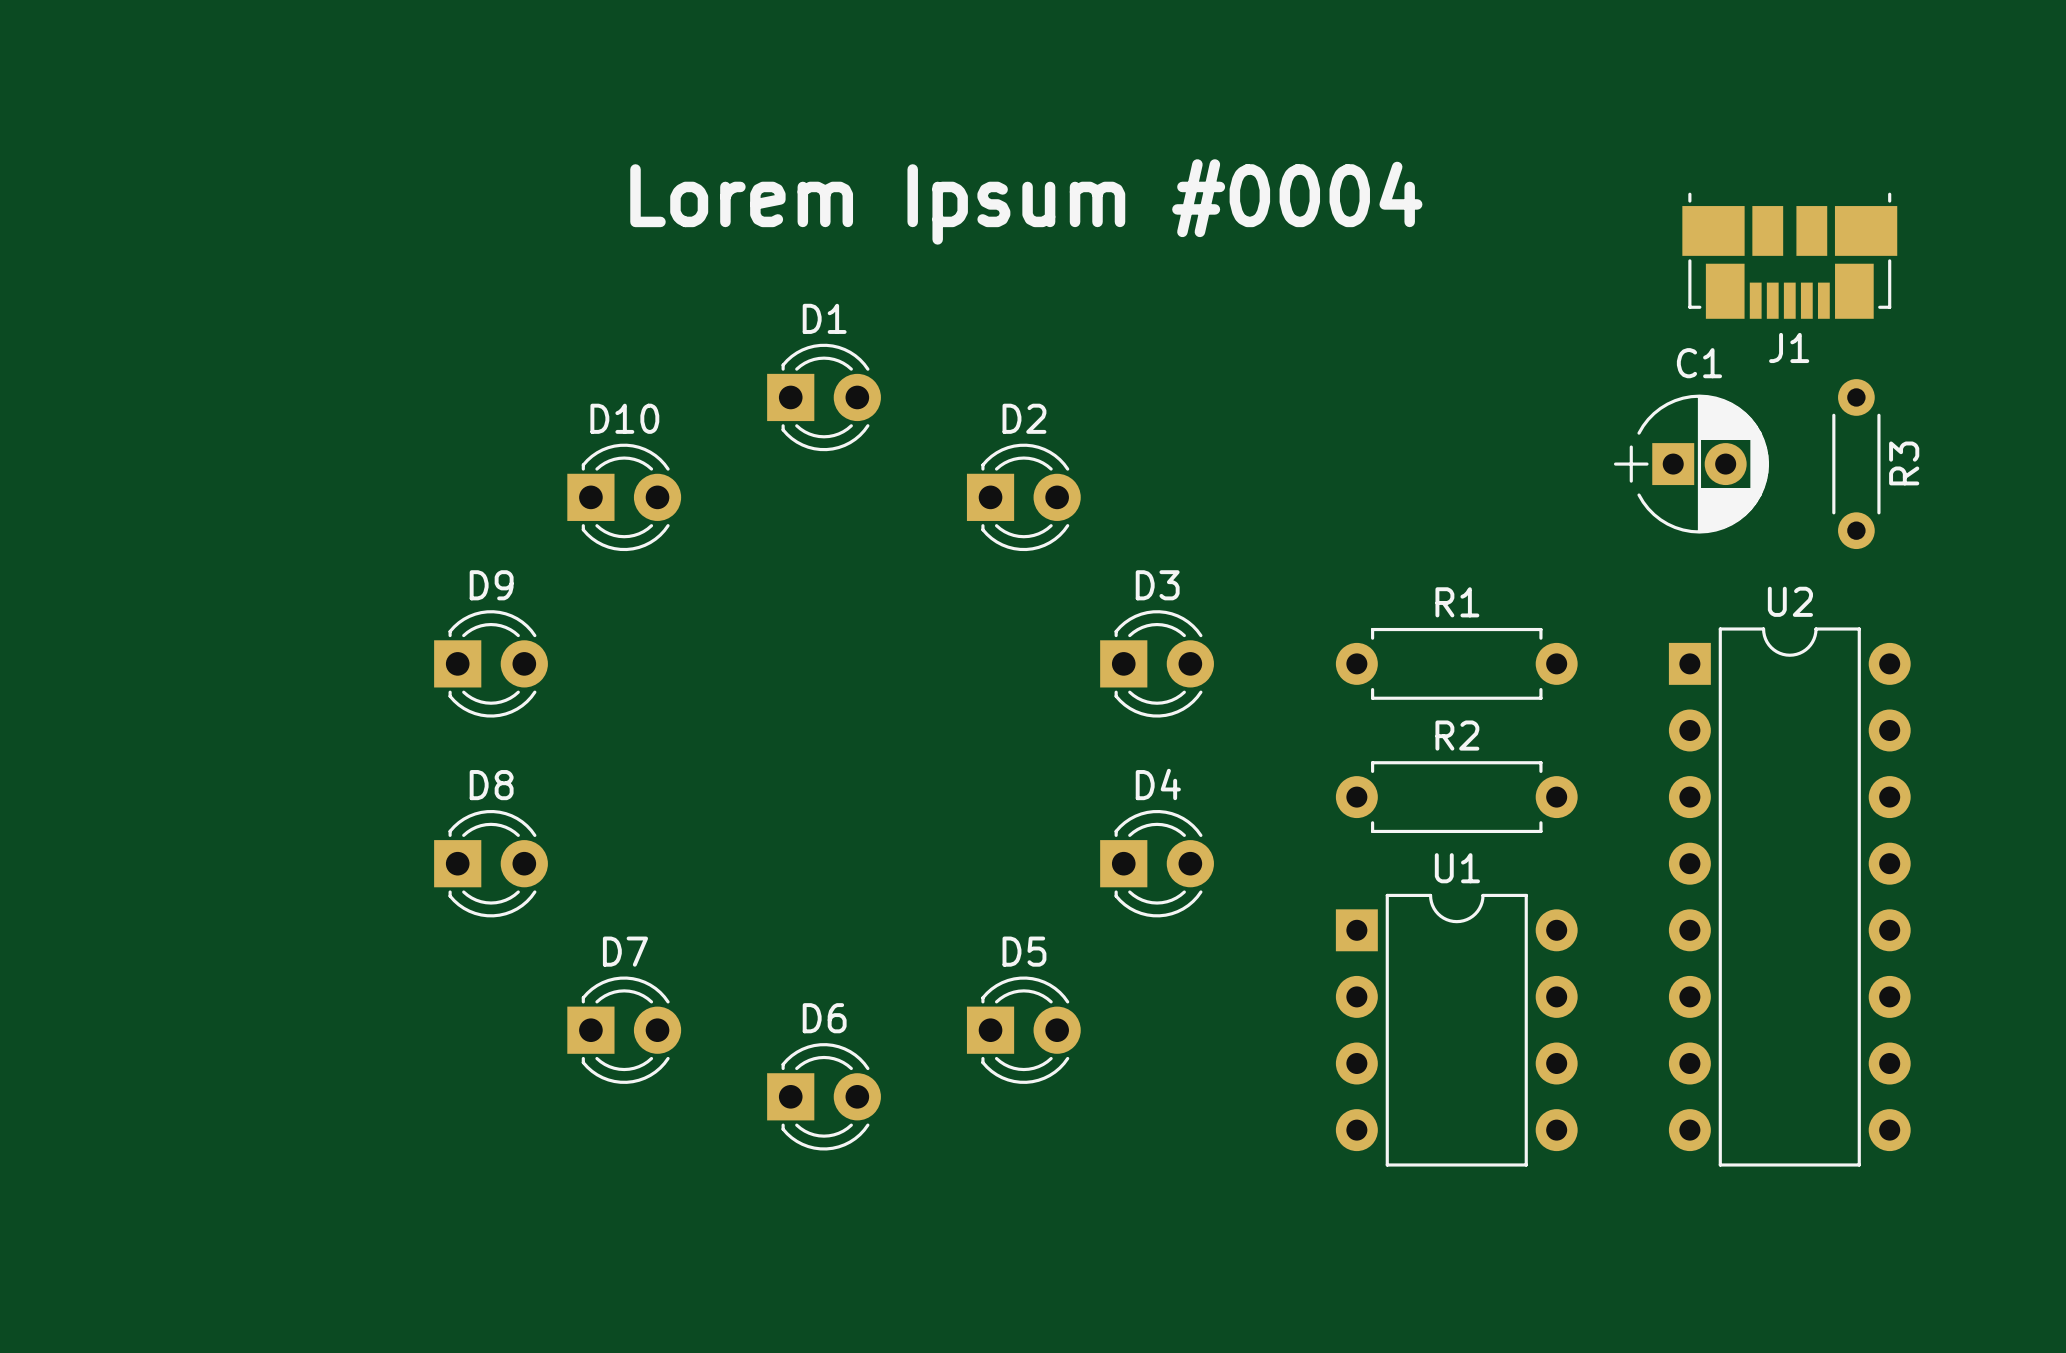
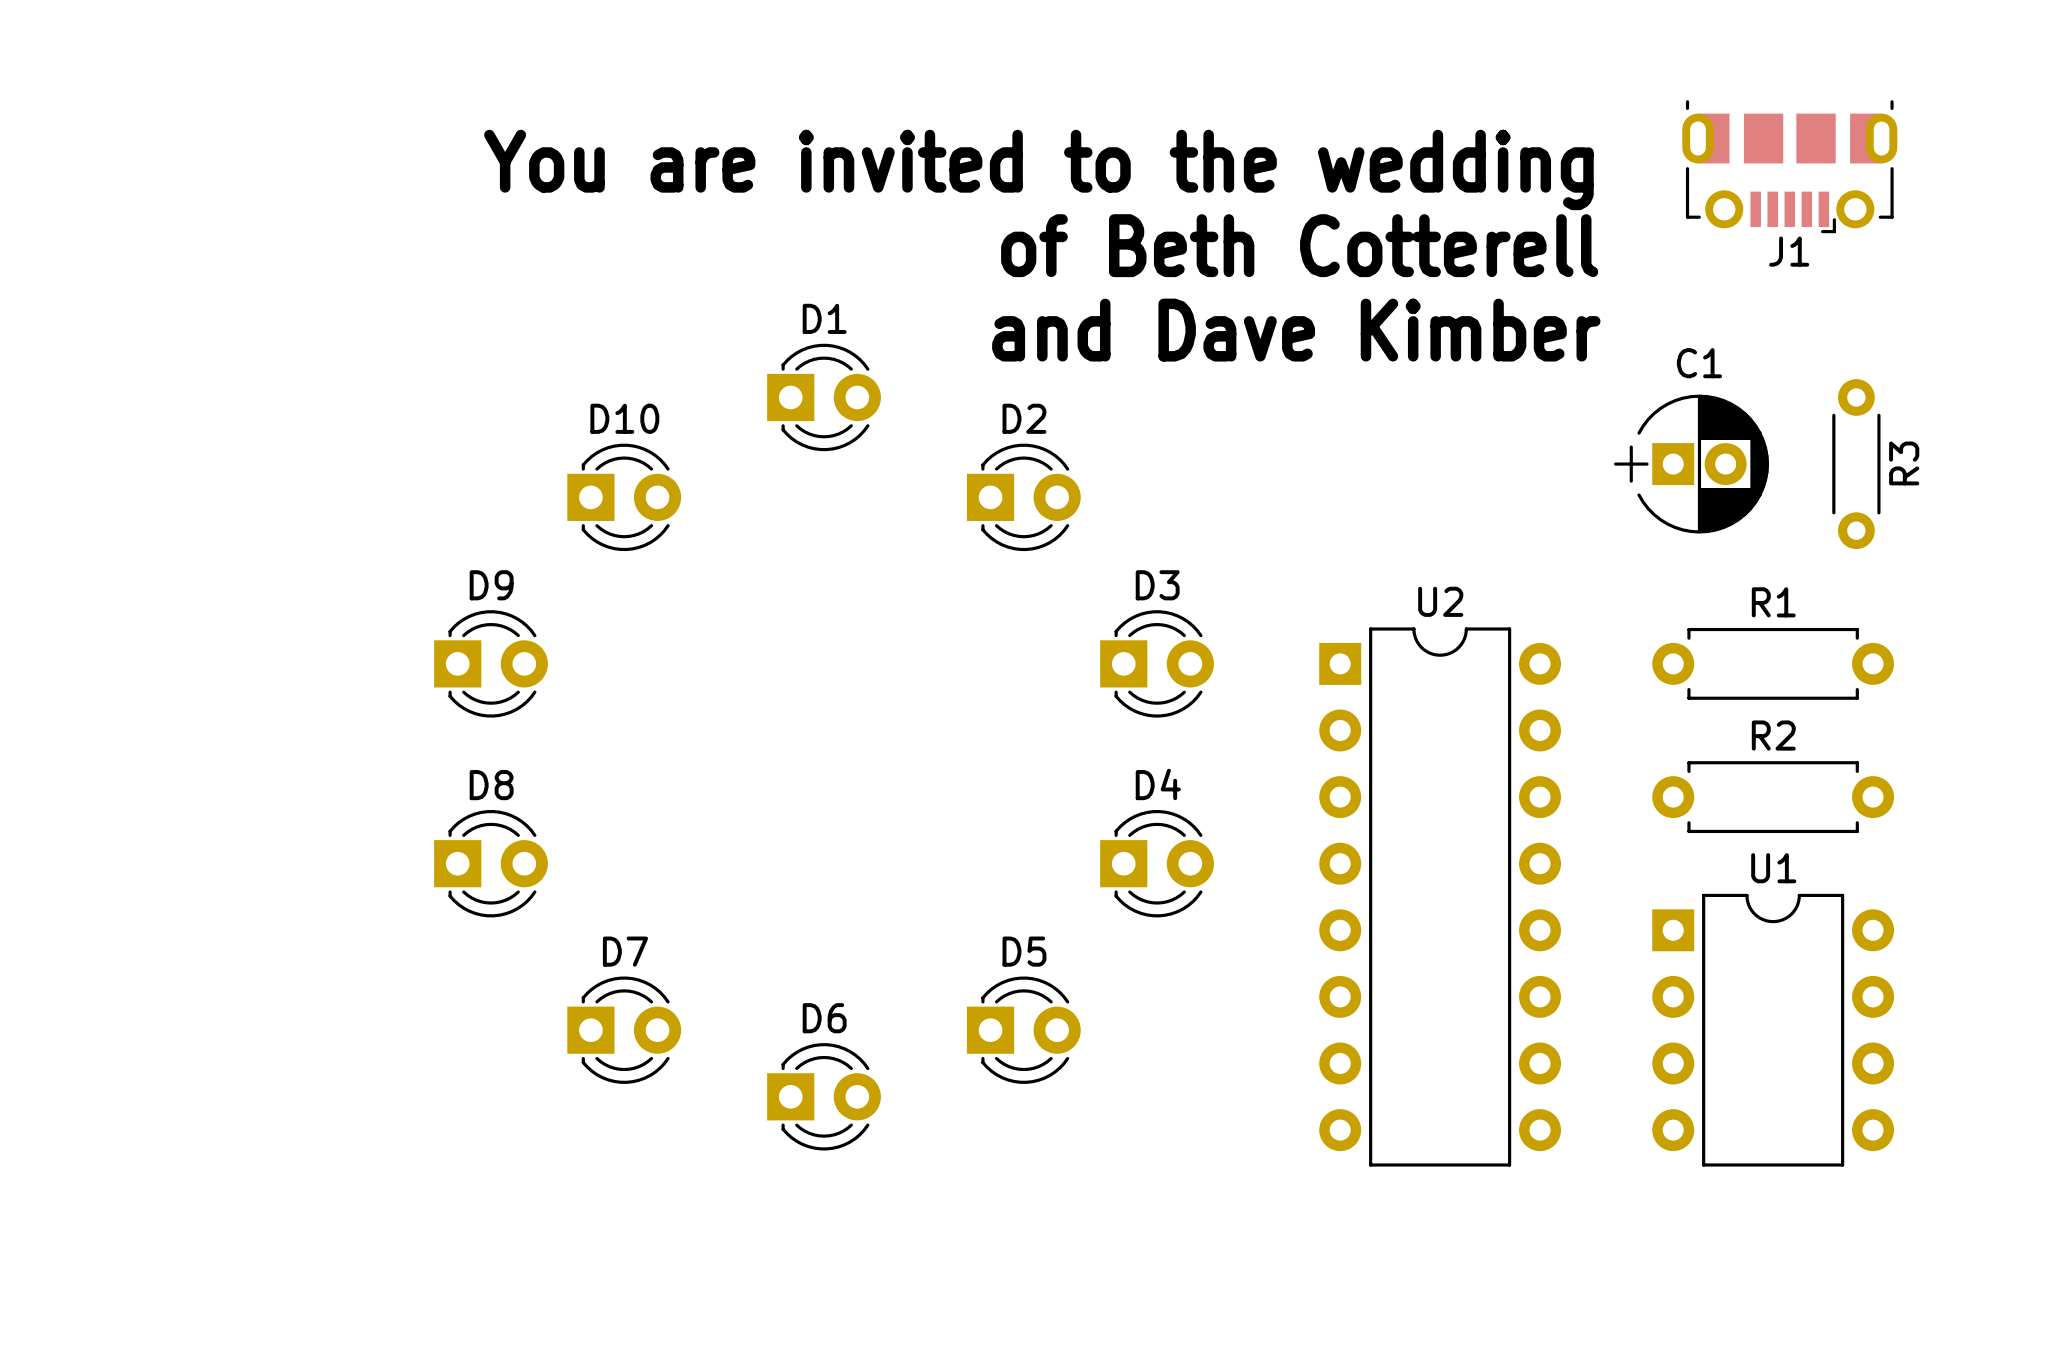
text: none -> You are invited to the wedding (1038, 169)
J1 footprint: [1682, 192, 1898, 319] -> [1682, 100, 1898, 234]
text: Lorem Ipsum #0004 (1026, 201) -> none
text: none -> of Beth Cotterell (1299, 245)
text: none -> and Dave Kimber (1296, 330)
R1 position: (1456, 663) -> (1773, 663)
R2 position: (1456, 797) -> (1773, 797)
U2 position: (1789, 896) -> (1440, 896)
U1 position: (1456, 1030) -> (1773, 1030)

